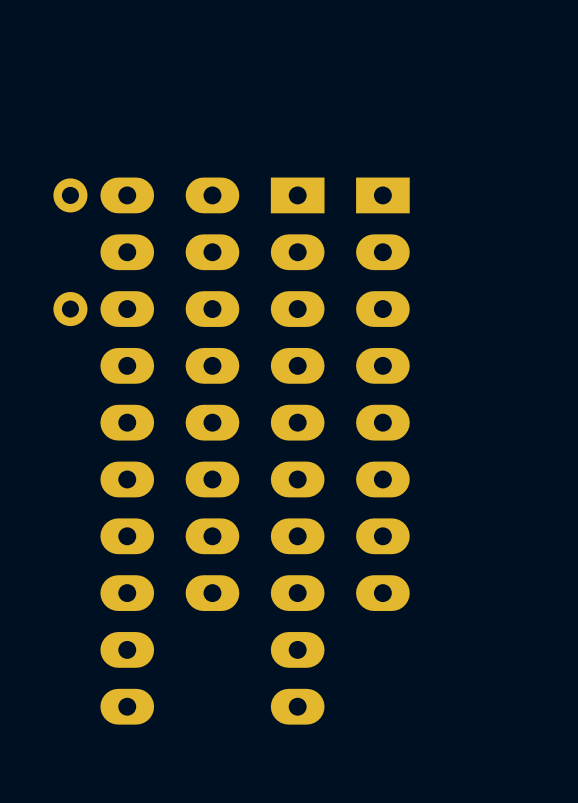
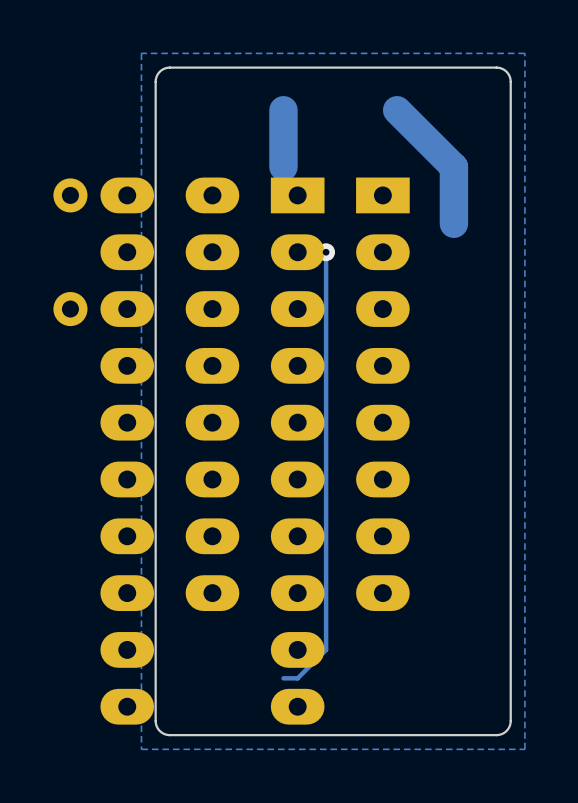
zone outline: none -> (524, 53) (141, 53) (141, 749) (524, 749) (524, 53)
board edge: none -> (496, 67) (169, 67) (162, 69) (157, 75) (155, 720) (157, 728) (163, 733) (496, 735) (504, 732) (509, 727) (510, 81) (506, 71) (496, 67)
track: none -> (283, 110) (283, 167)
track: none -> (397, 110) (453, 167) (453, 223)
track: none -> (326, 252) (326, 649) (297, 678) (283, 678)
via: none -> (326, 252)

